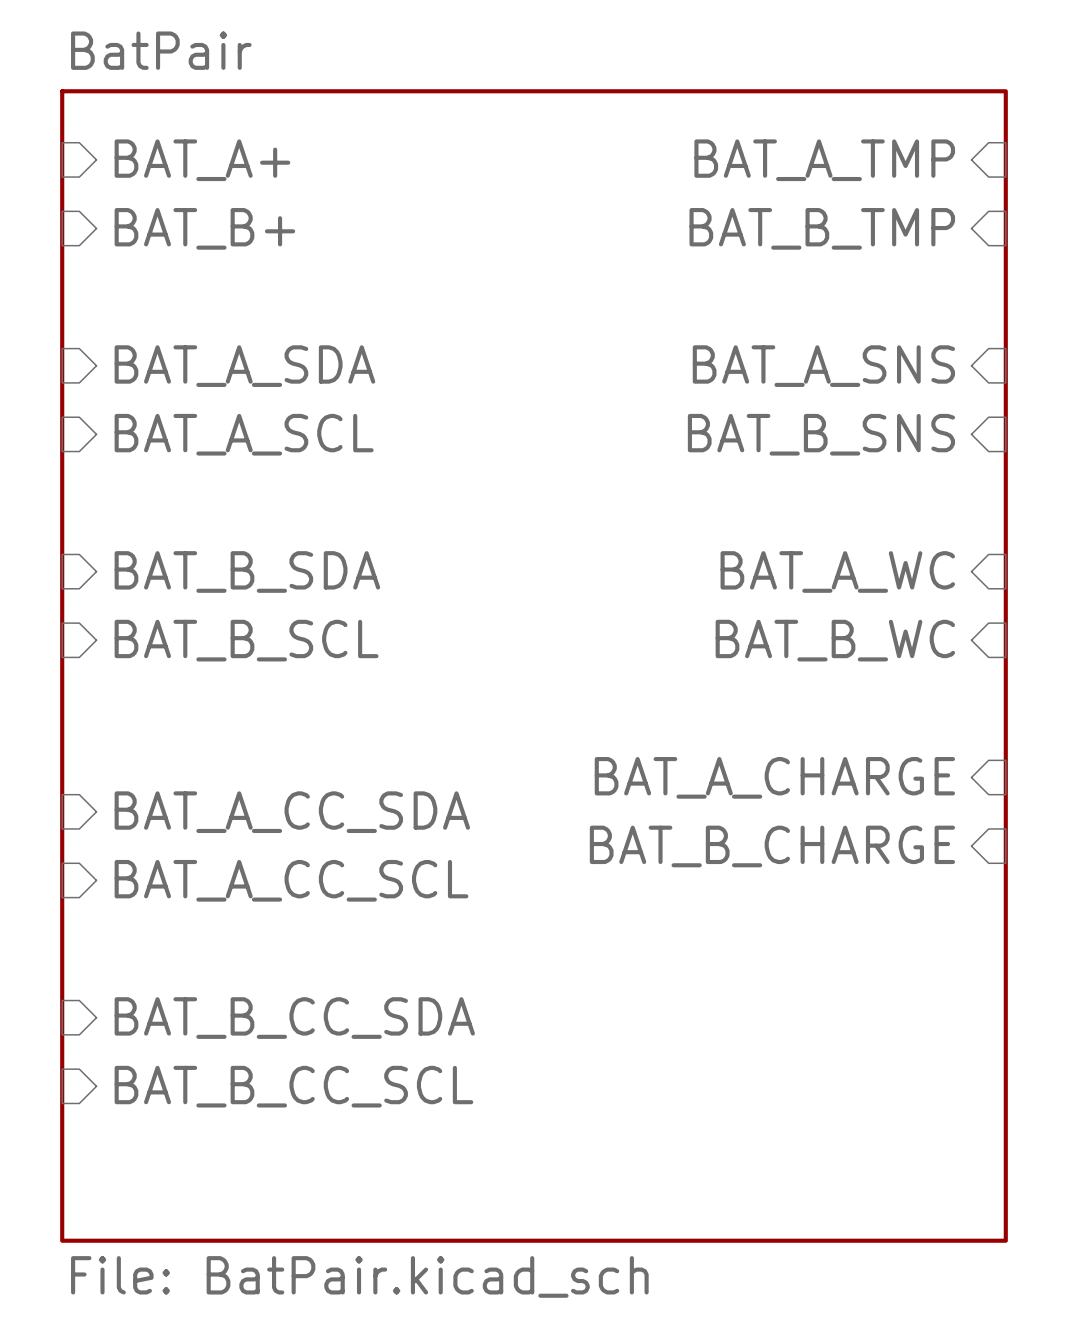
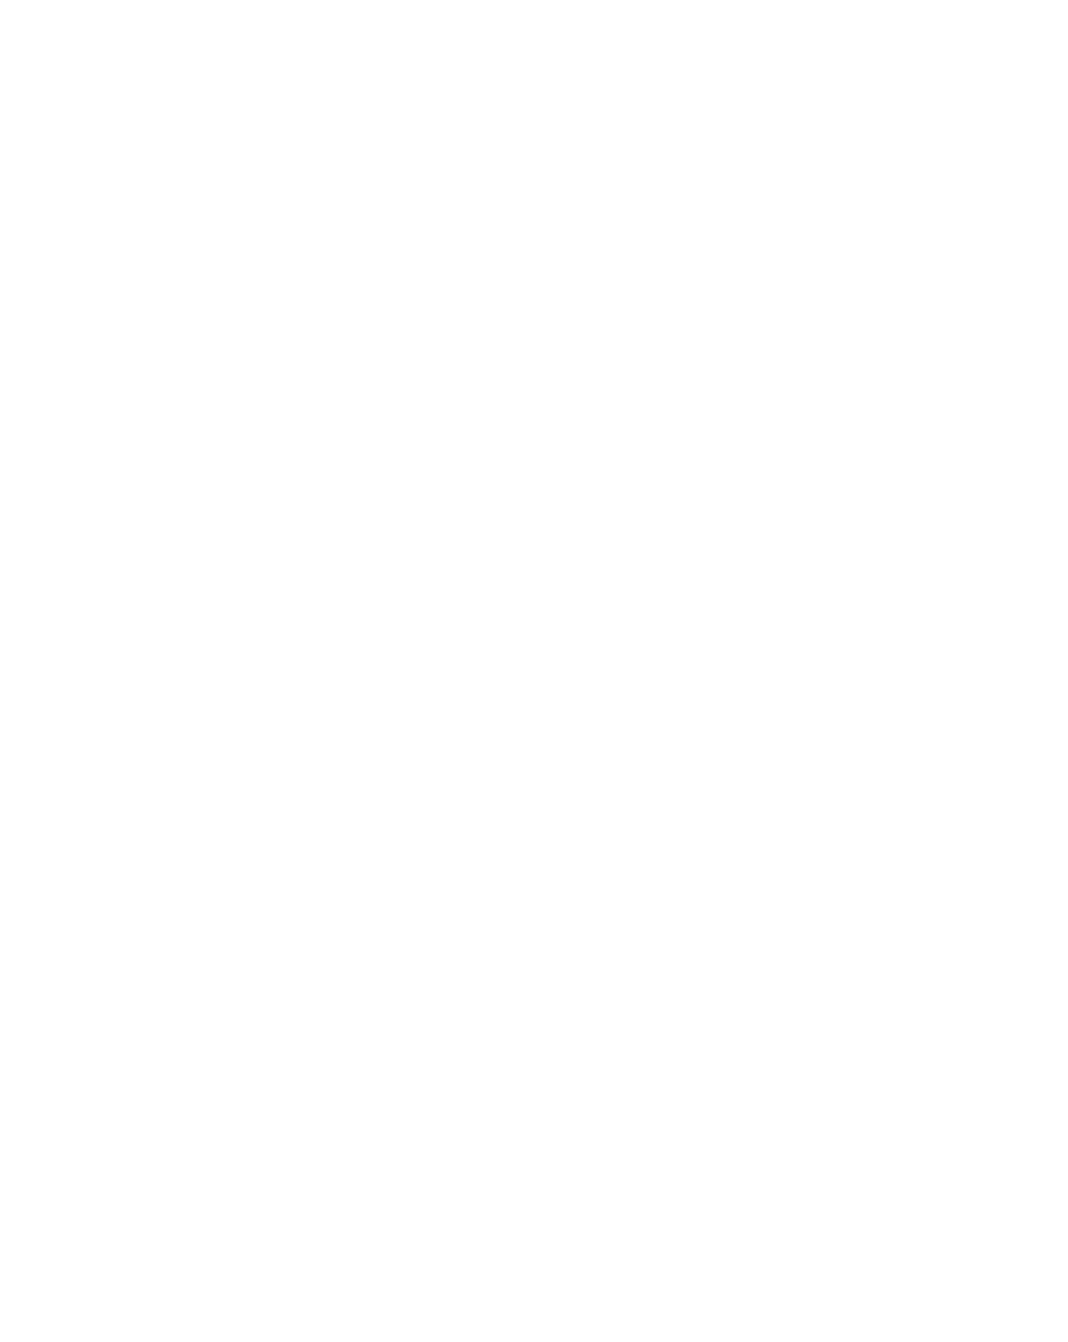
sheet pin: BAT_A+ (202, 160) -> none
sheet pin: BAT_A_TMP (824, 160) -> none
sheet pin: BAT_B+ (204, 228) -> none
sheet pin: BAT_B_TMP (822, 228) -> none
sheet pin: BAT_A_SDA (244, 366) -> none
sheet pin: BAT_A_SNS (823, 366) -> none
sheet pin: BAT_A_SCL (244, 434) -> none
sheet pin: BAT_B_SNS (821, 434) -> none
sheet pin: BAT_B_SDA (247, 571) -> none
sheet pin: BAT_A_WC (837, 571) -> none
sheet pin: BAT_B_SCL (246, 640) -> none
sheet pin: BAT_B_WC (835, 640) -> none
sheet BatPair: File: BatPair.kicad_sch (534, 665) -> none
sheet pin: BAT_A_CHARGE (774, 777) -> none
sheet pin: BAT_A_CC_SDA (292, 812) -> none
sheet pin: BAT_B_CHARGE (772, 846) -> none
sheet pin: BAT_A_CC_SCL (291, 880) -> none
sheet pin: BAT_B_CC_SDA (294, 1018) -> none
sheet pin: BAT_B_CC_SCL (293, 1086) -> none

